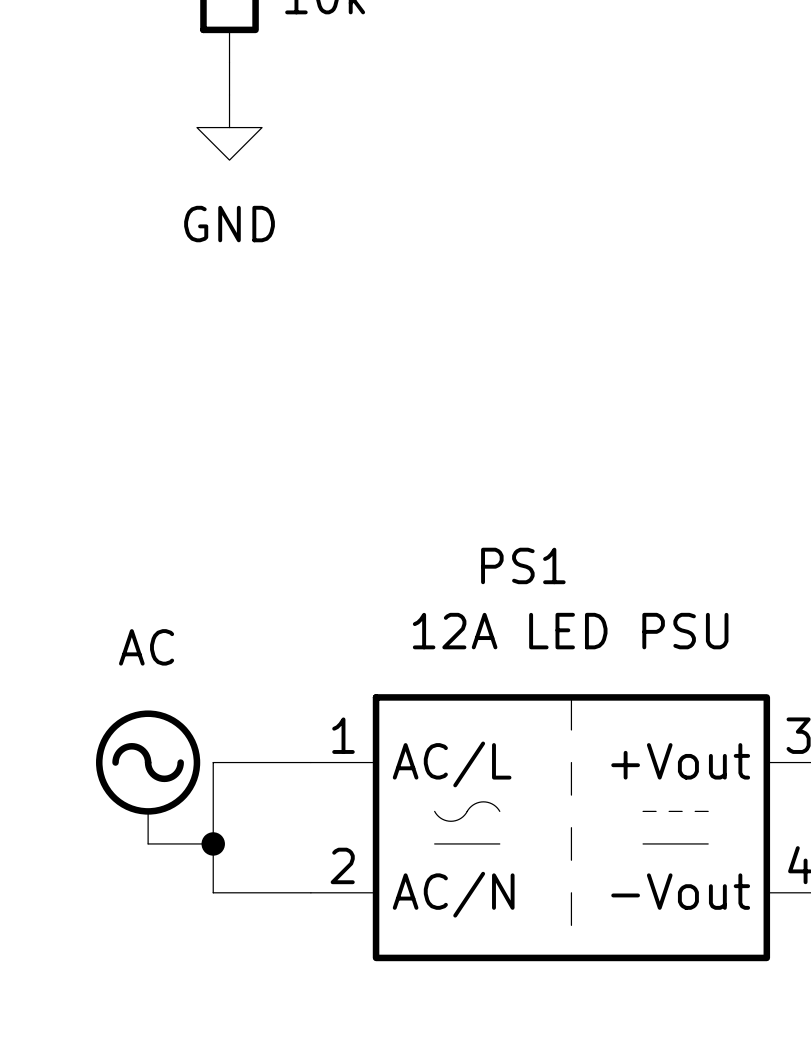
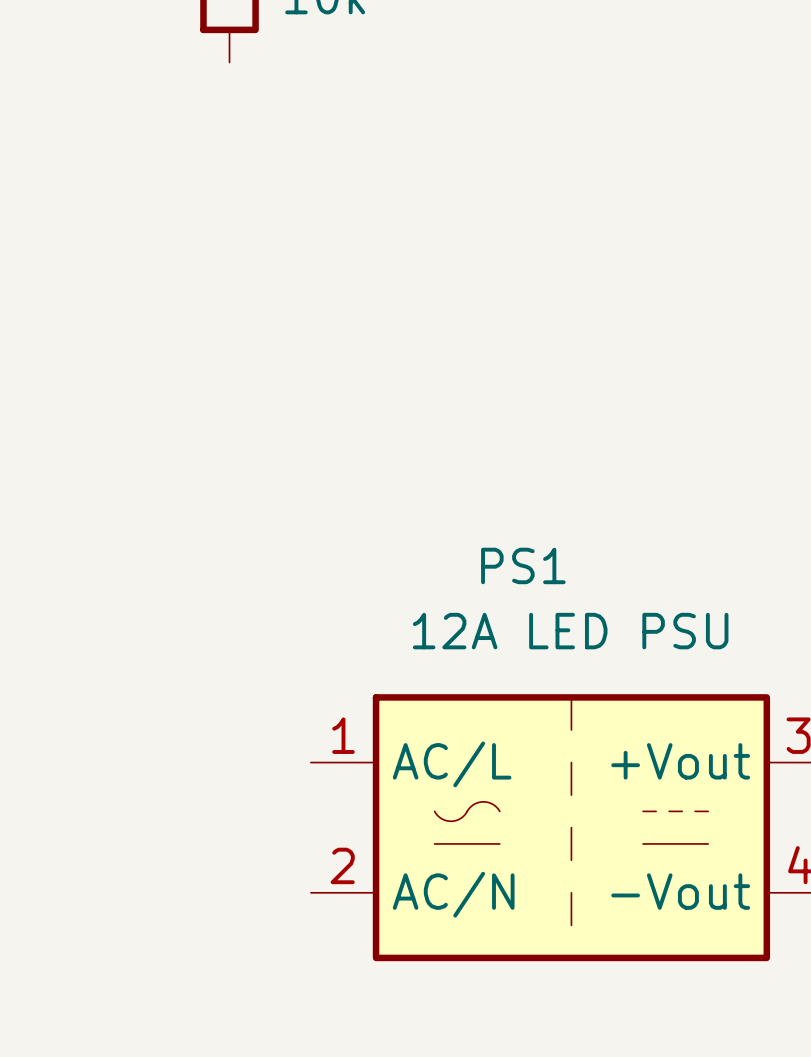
wire: (229, 62) (229, 95) -> none
power symbol: GND (229, 127) -> none
wire: (310, 762) (213, 762) (213, 892) (310, 892) -> none
power symbol: AC (148, 777) -> none
wire: (148, 843) (213, 843) -> none
junction: (213, 843) -> none

